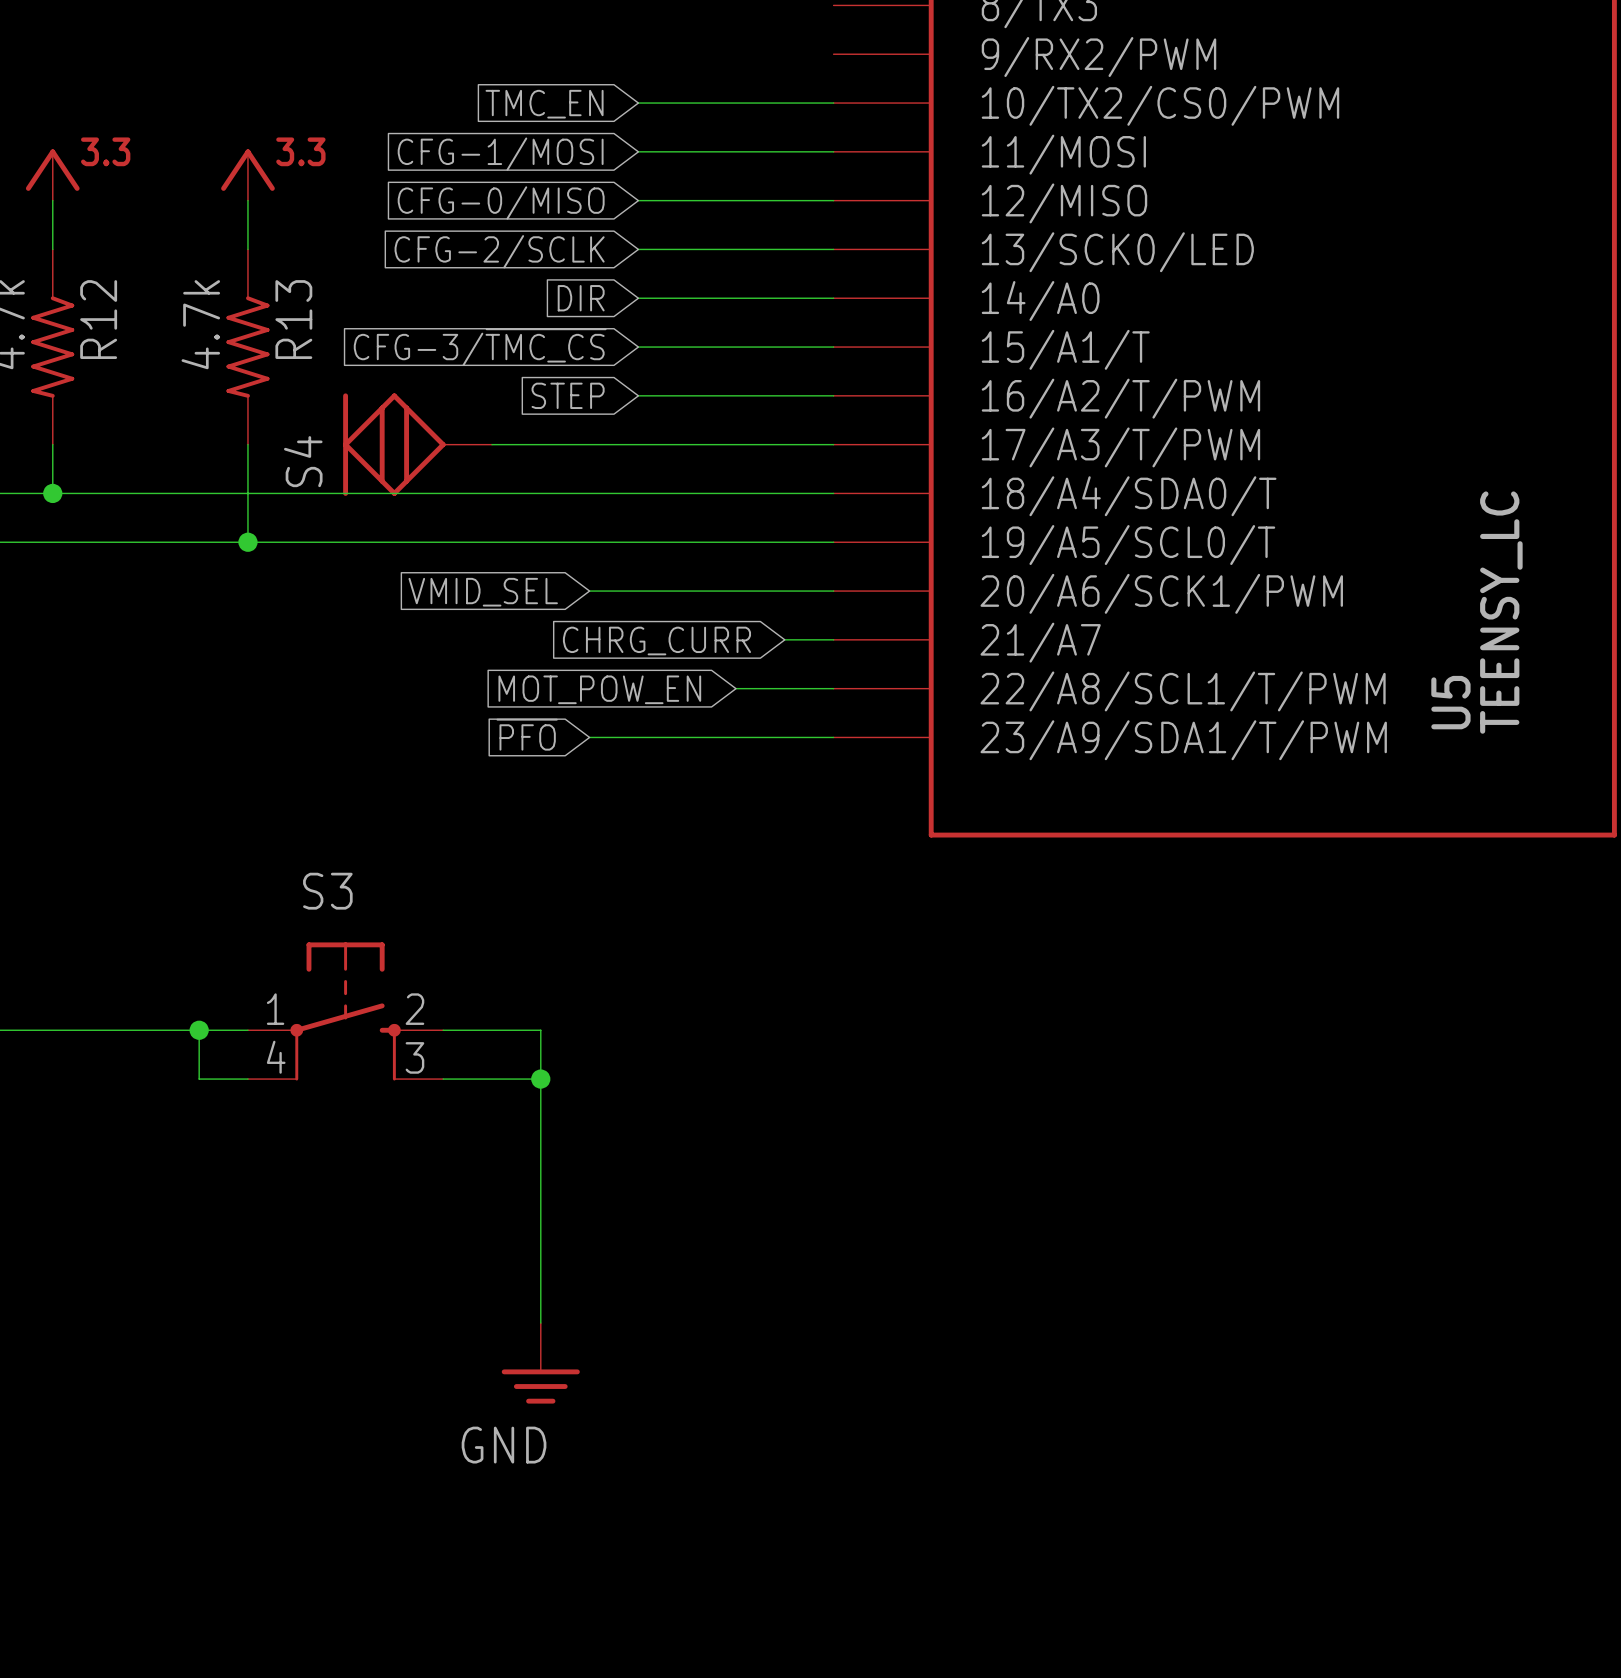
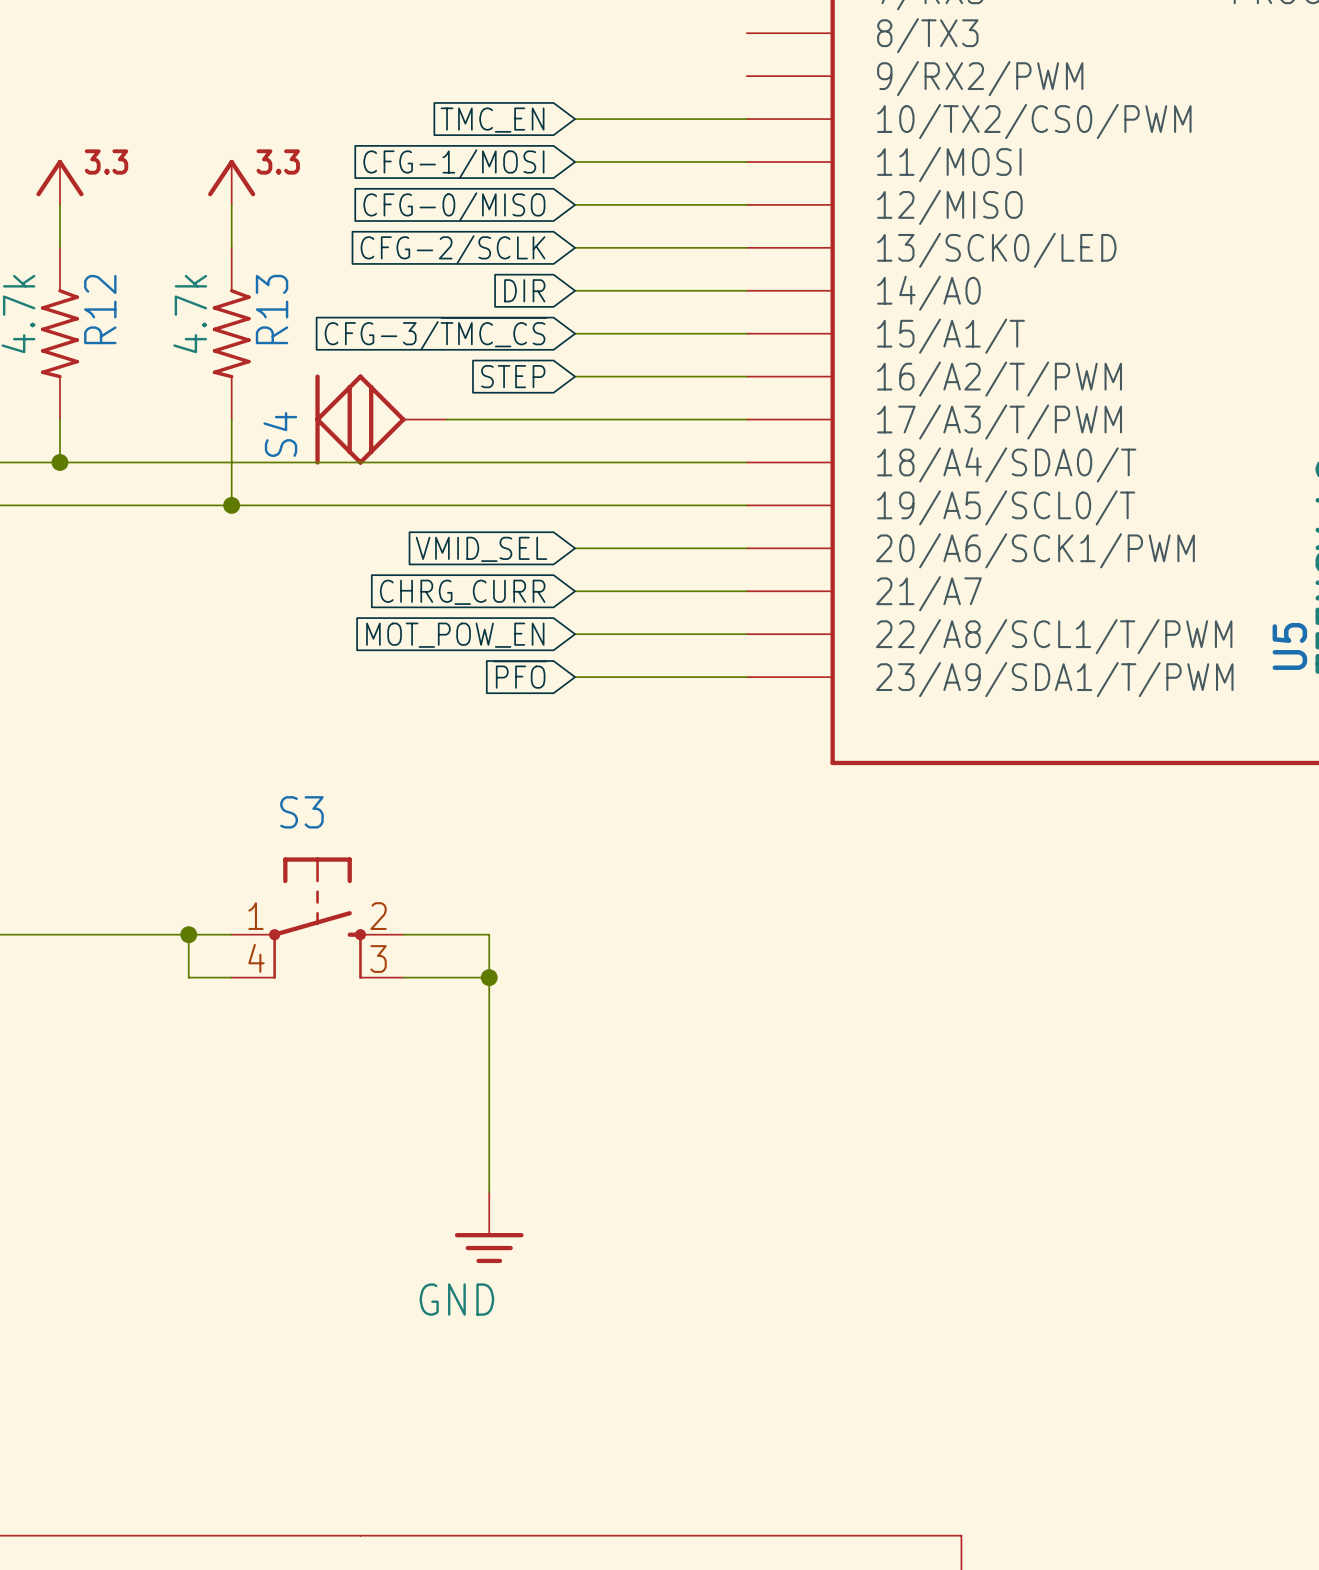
wire: (589, 591) (638, 591) -> none
global label position: VMID_SEL (483, 592) -> VMID_SEL (481, 549)
wire: none -> (575, 591) (703, 591)
global label position: CHRG_CURR (656, 641) -> CHRG_CURR (462, 592)
wire: none -> (575, 634) (660, 634)
global label position: MOT_POW_EN (599, 689) -> MOT_POW_EN (455, 635)
global label position: ~{PFO} (527, 734) -> ~{PFO} (520, 674)
wire: (589, 737) (638, 737) -> none

